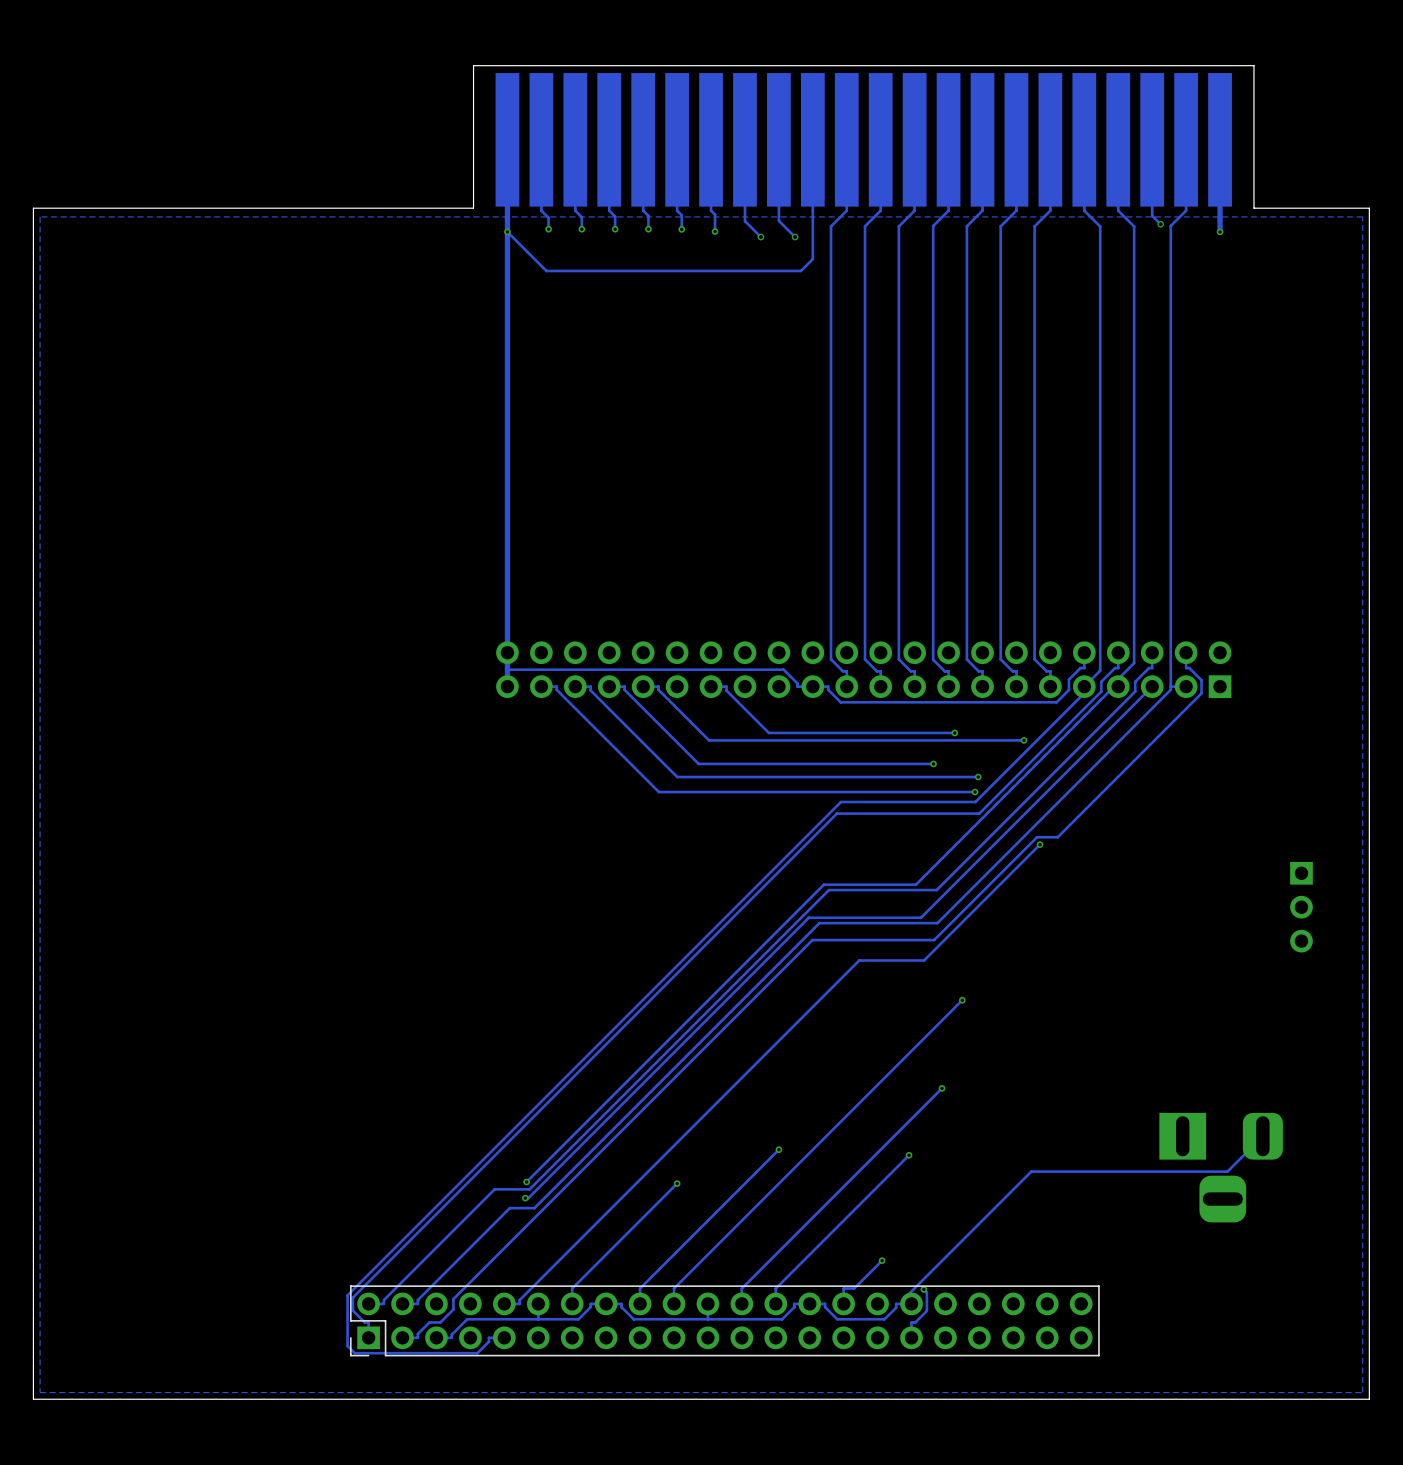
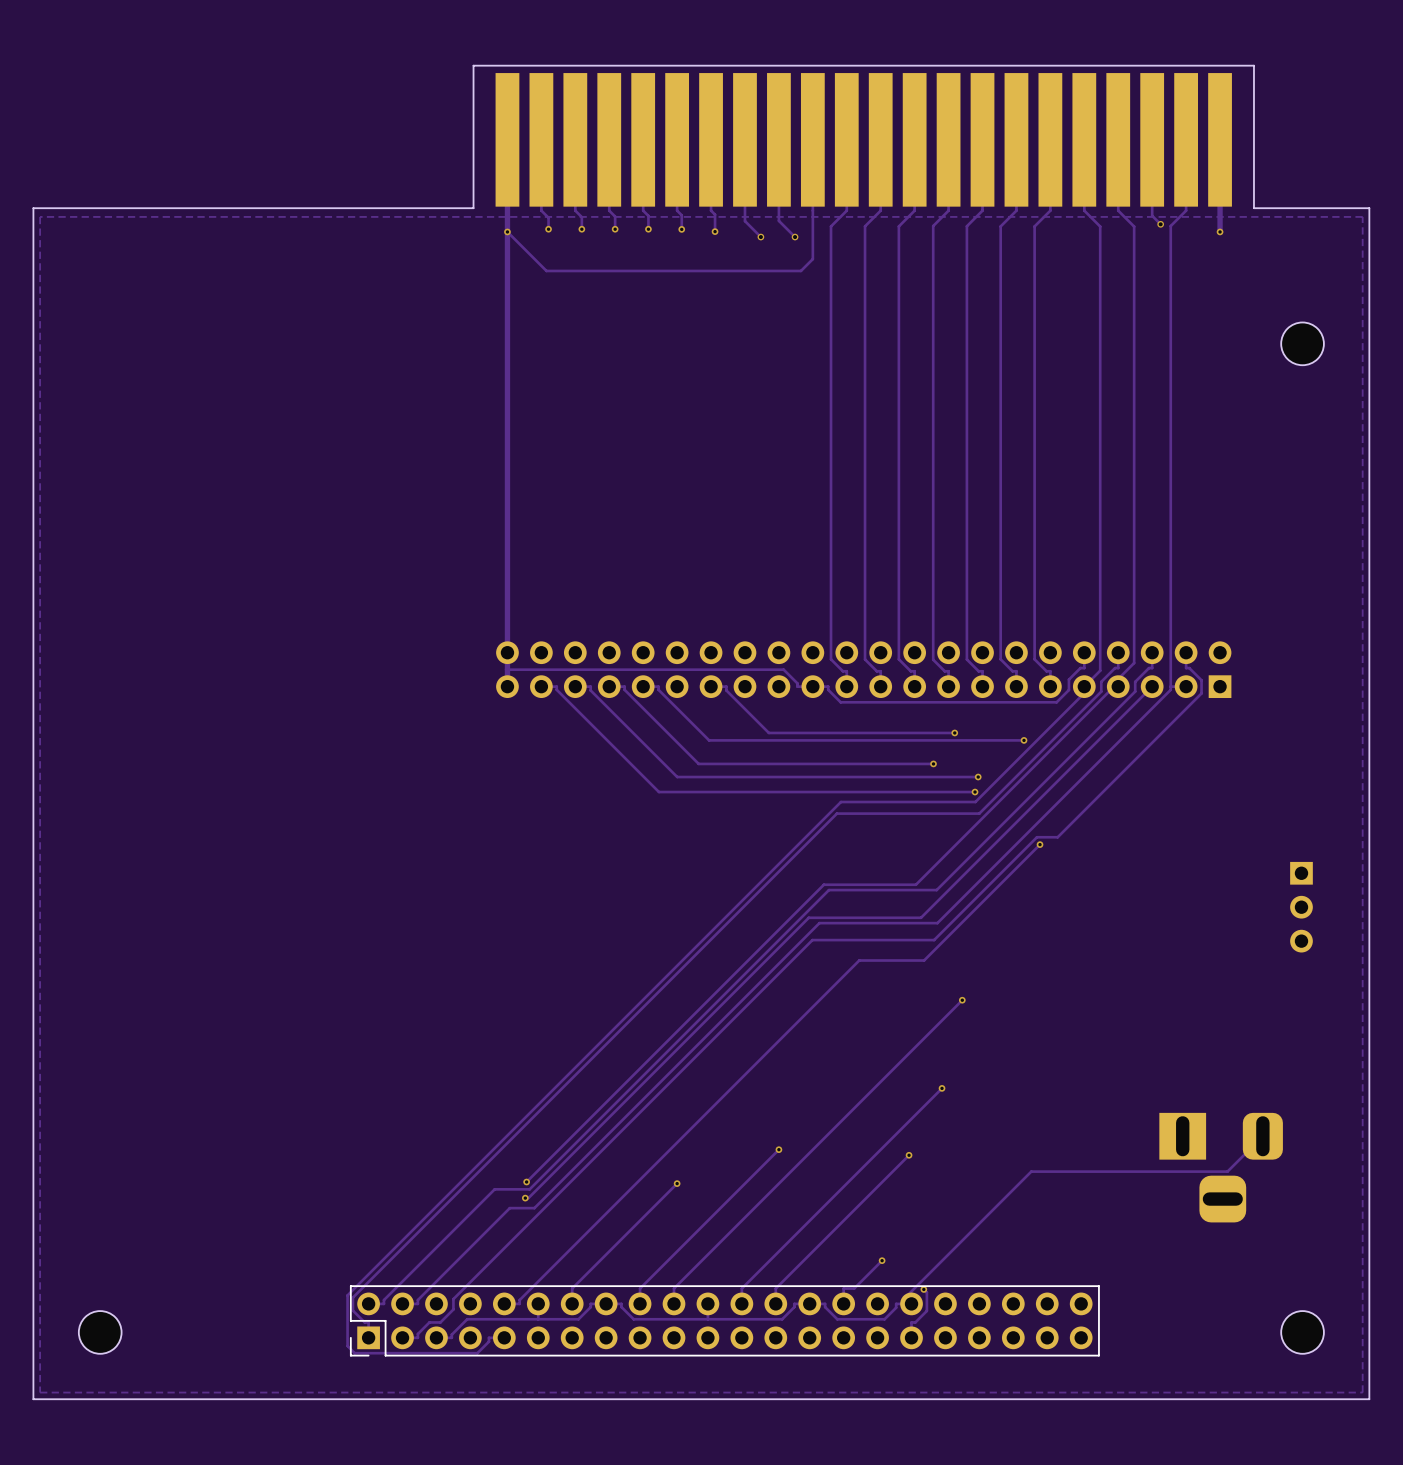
part: none -> (1302, 343)
part: none -> (100, 1332)
part: none -> (1302, 1332)

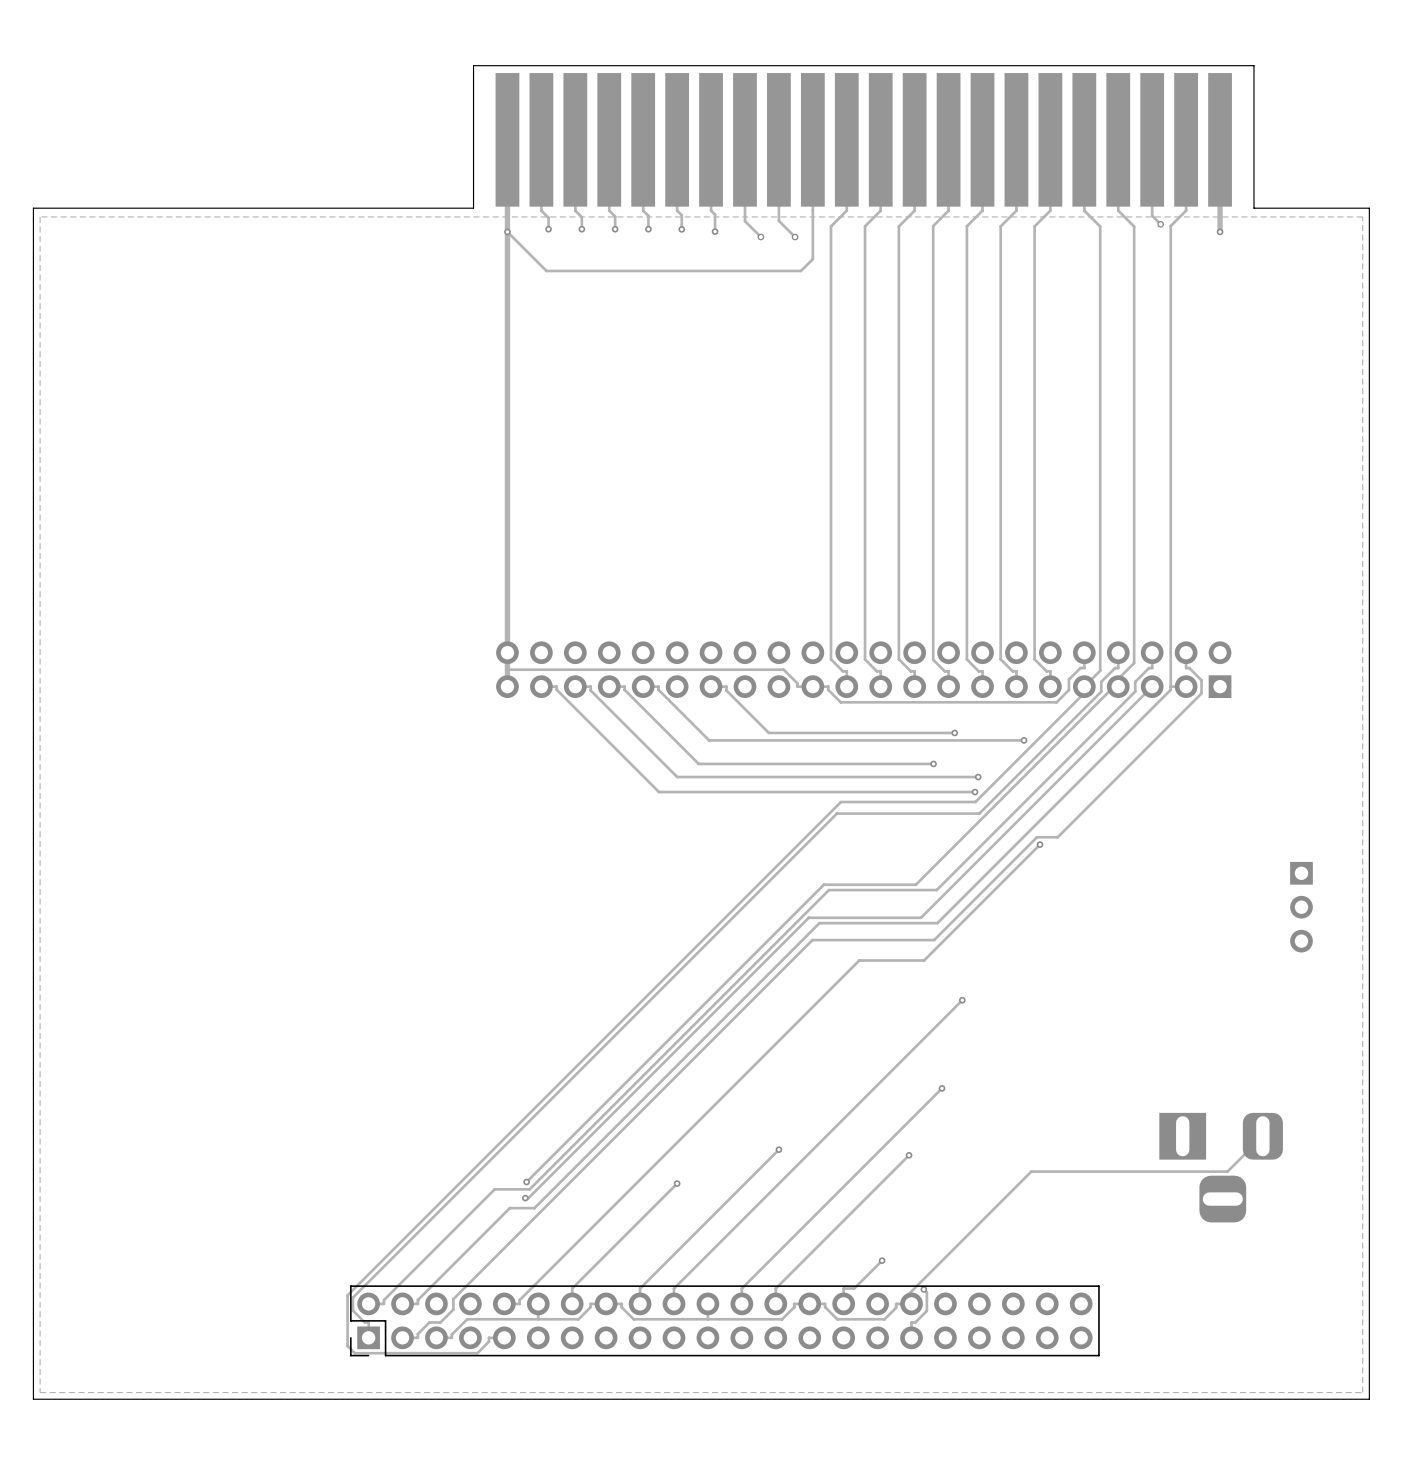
part: (1302, 343) -> none
part: (100, 1332) -> none
part: (1302, 1332) -> none

